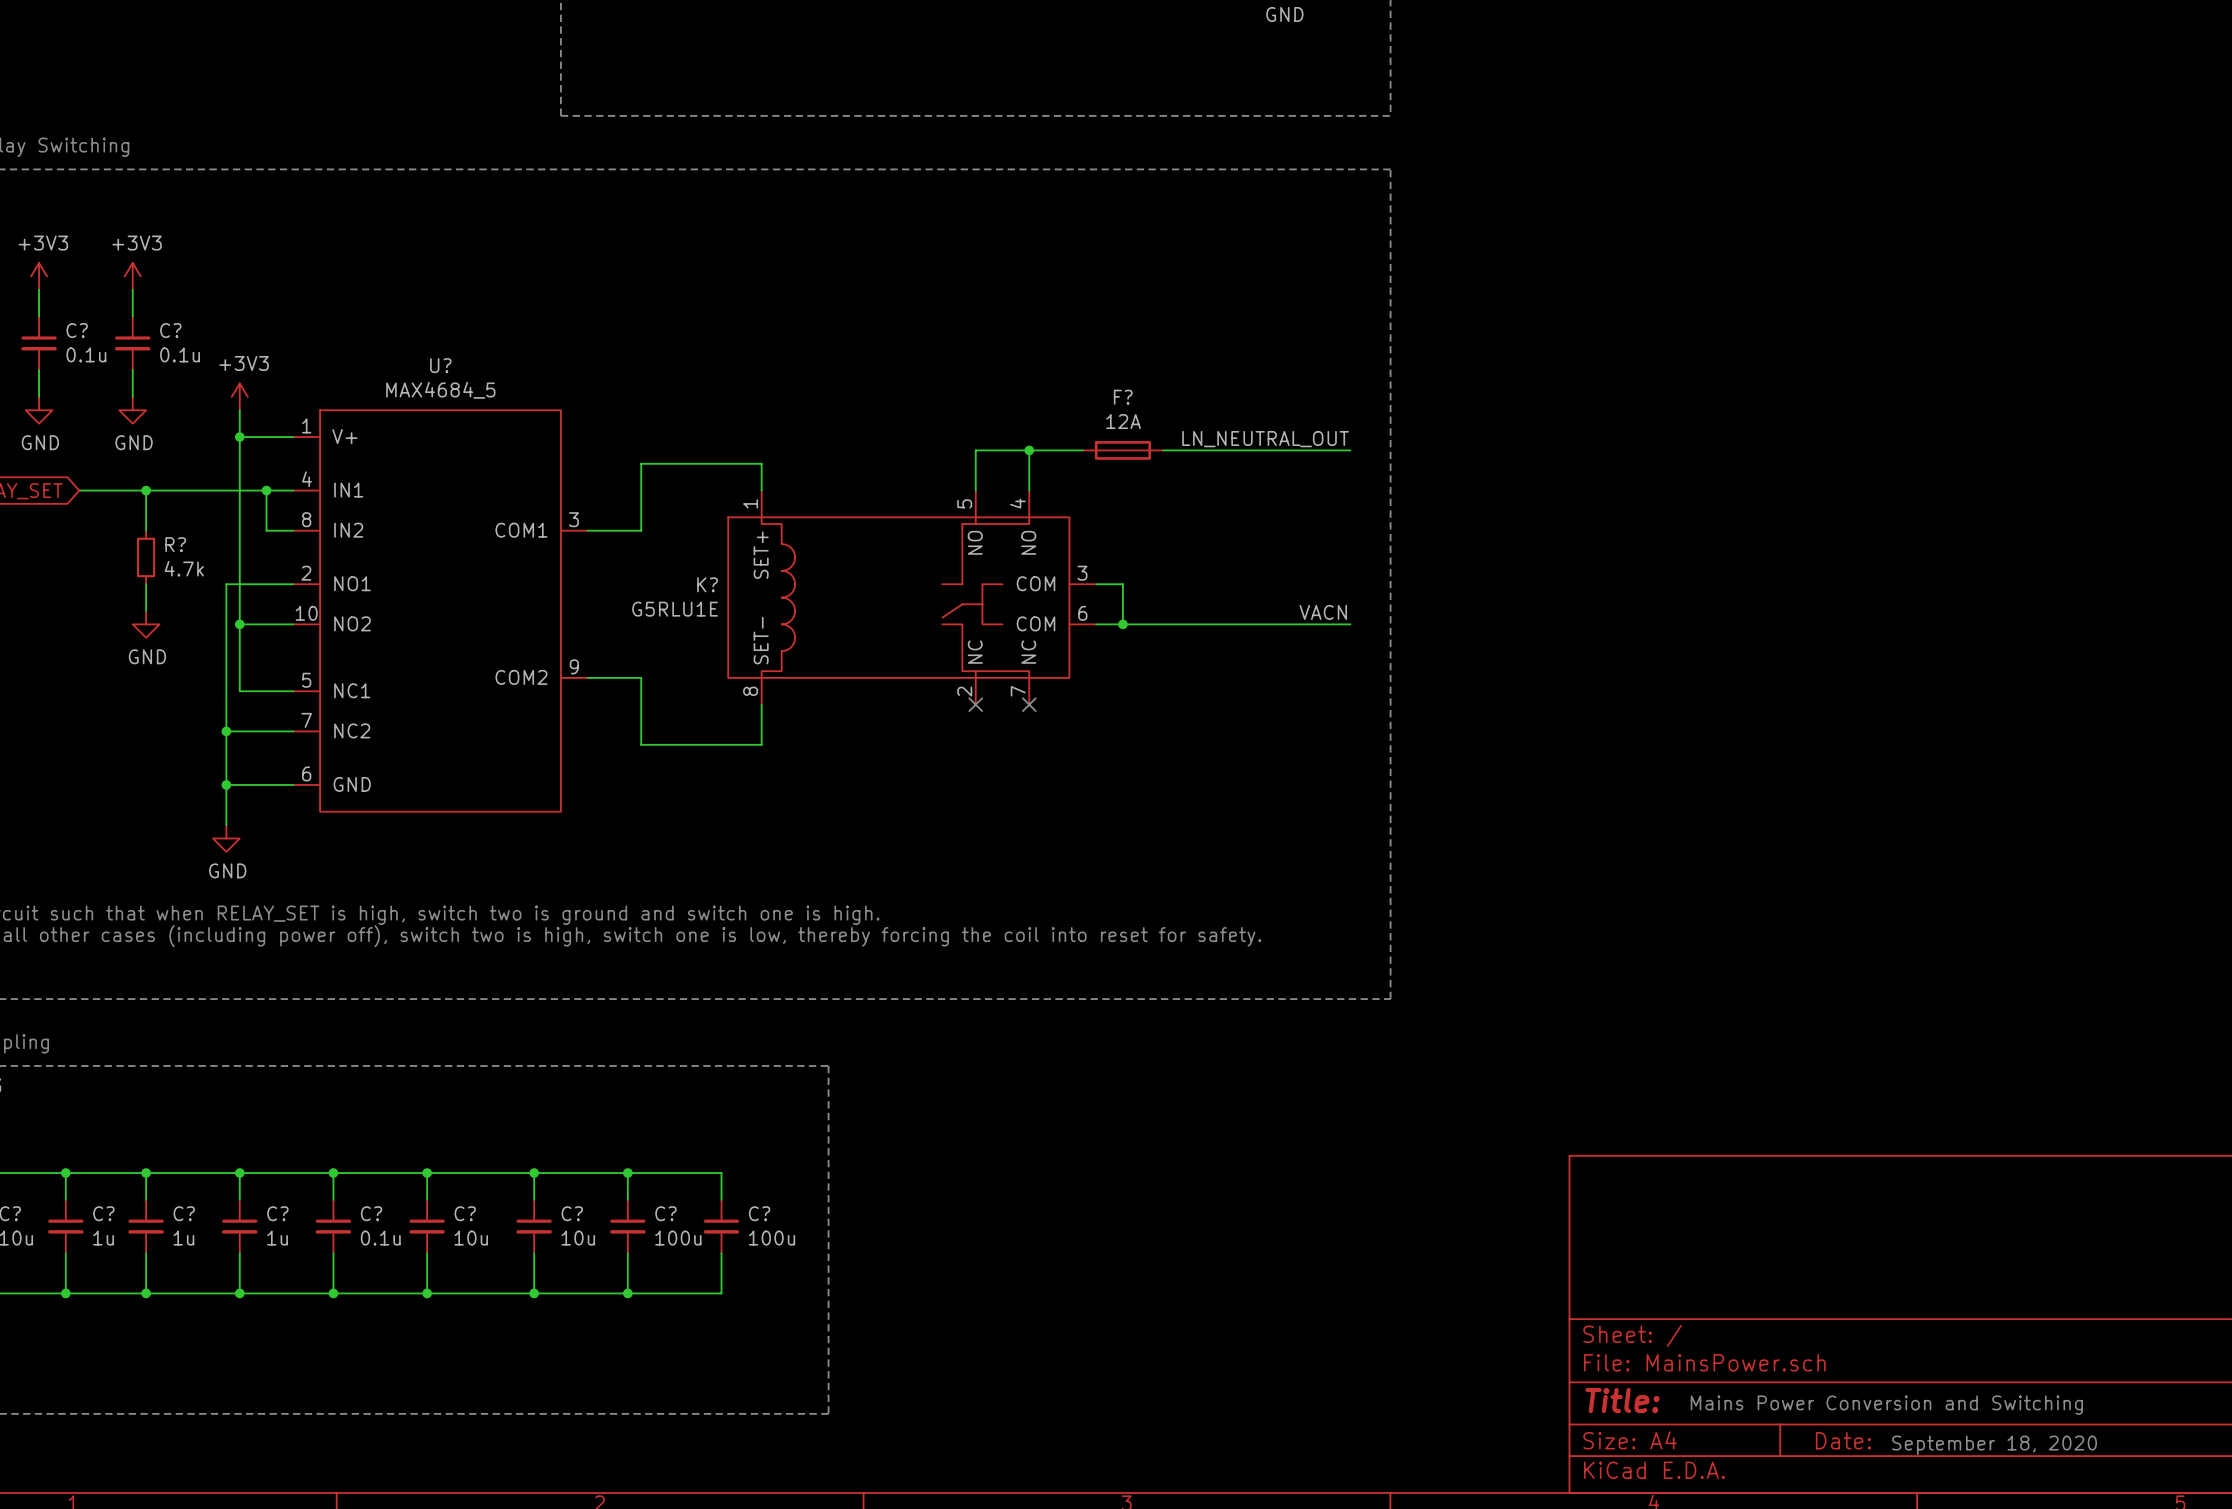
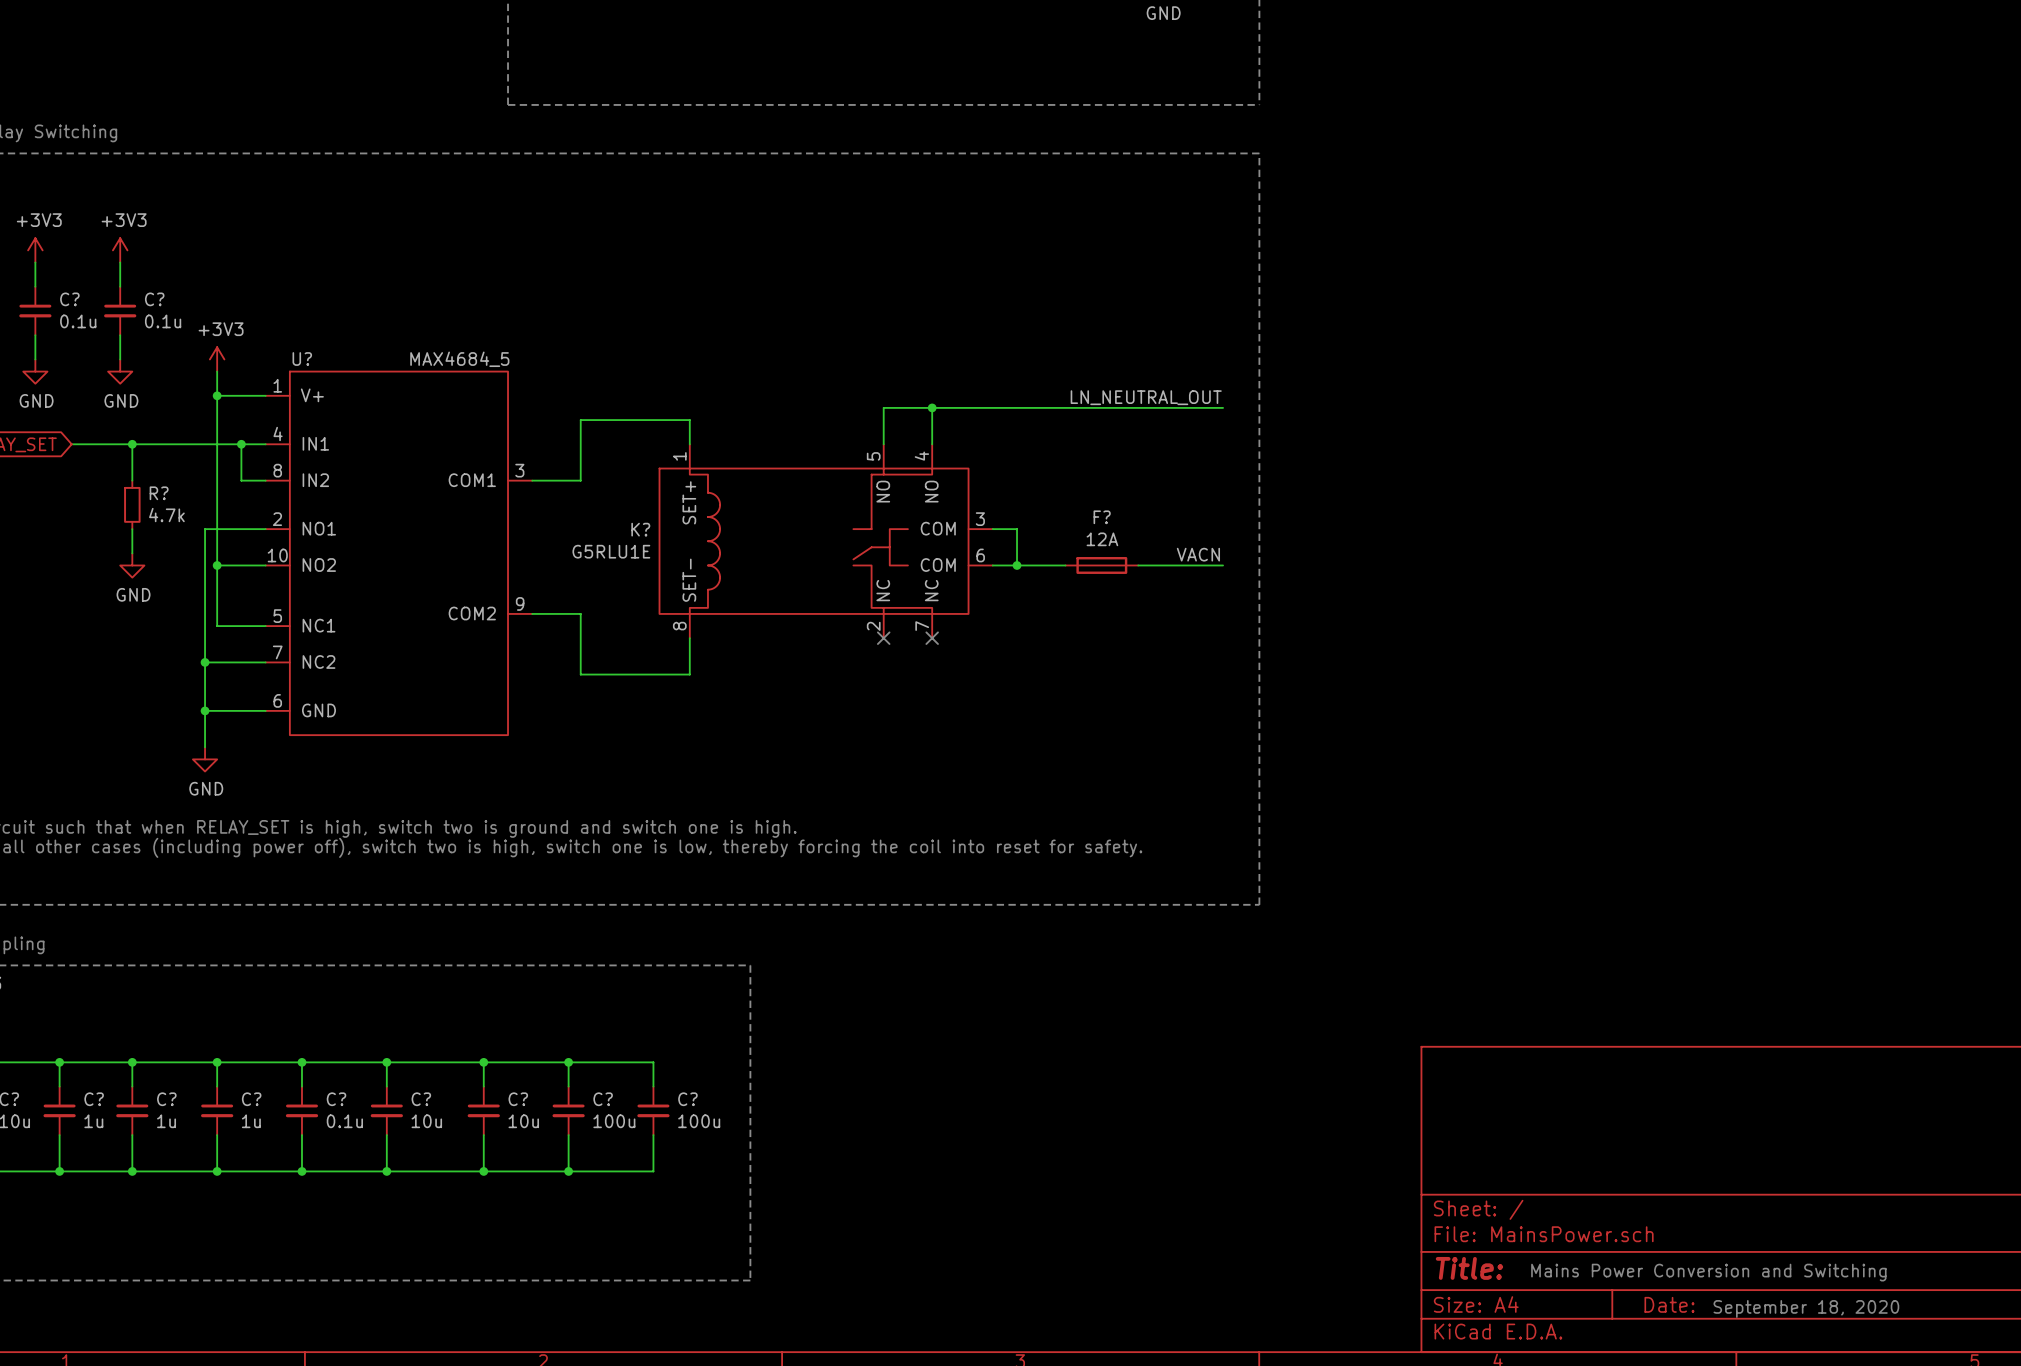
U? name position: U? (440, 365) -> U? (302, 359)
U? value position: MAX4684_5 (440, 390) -> MAX4684_5 (459, 359)
F? position: (1122, 450) -> (1101, 565)

